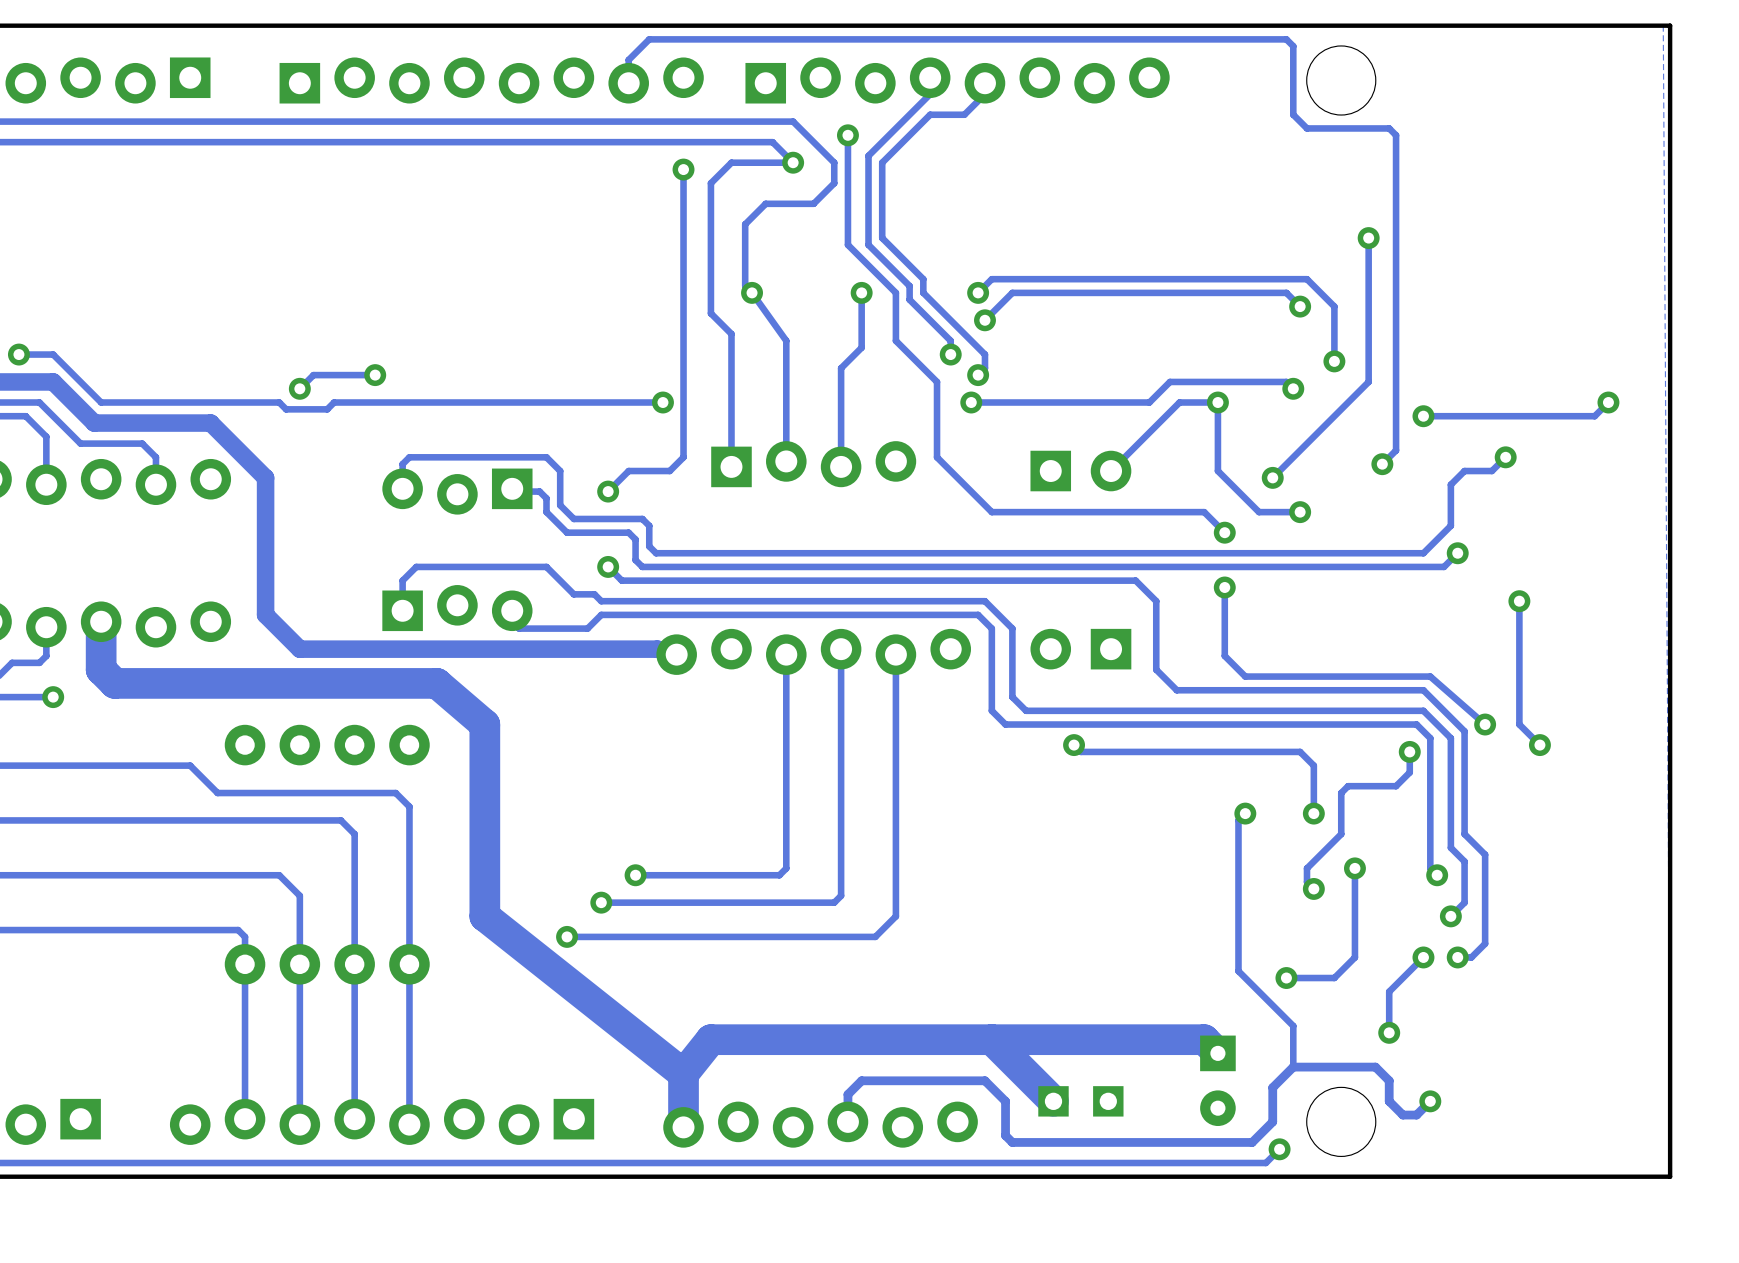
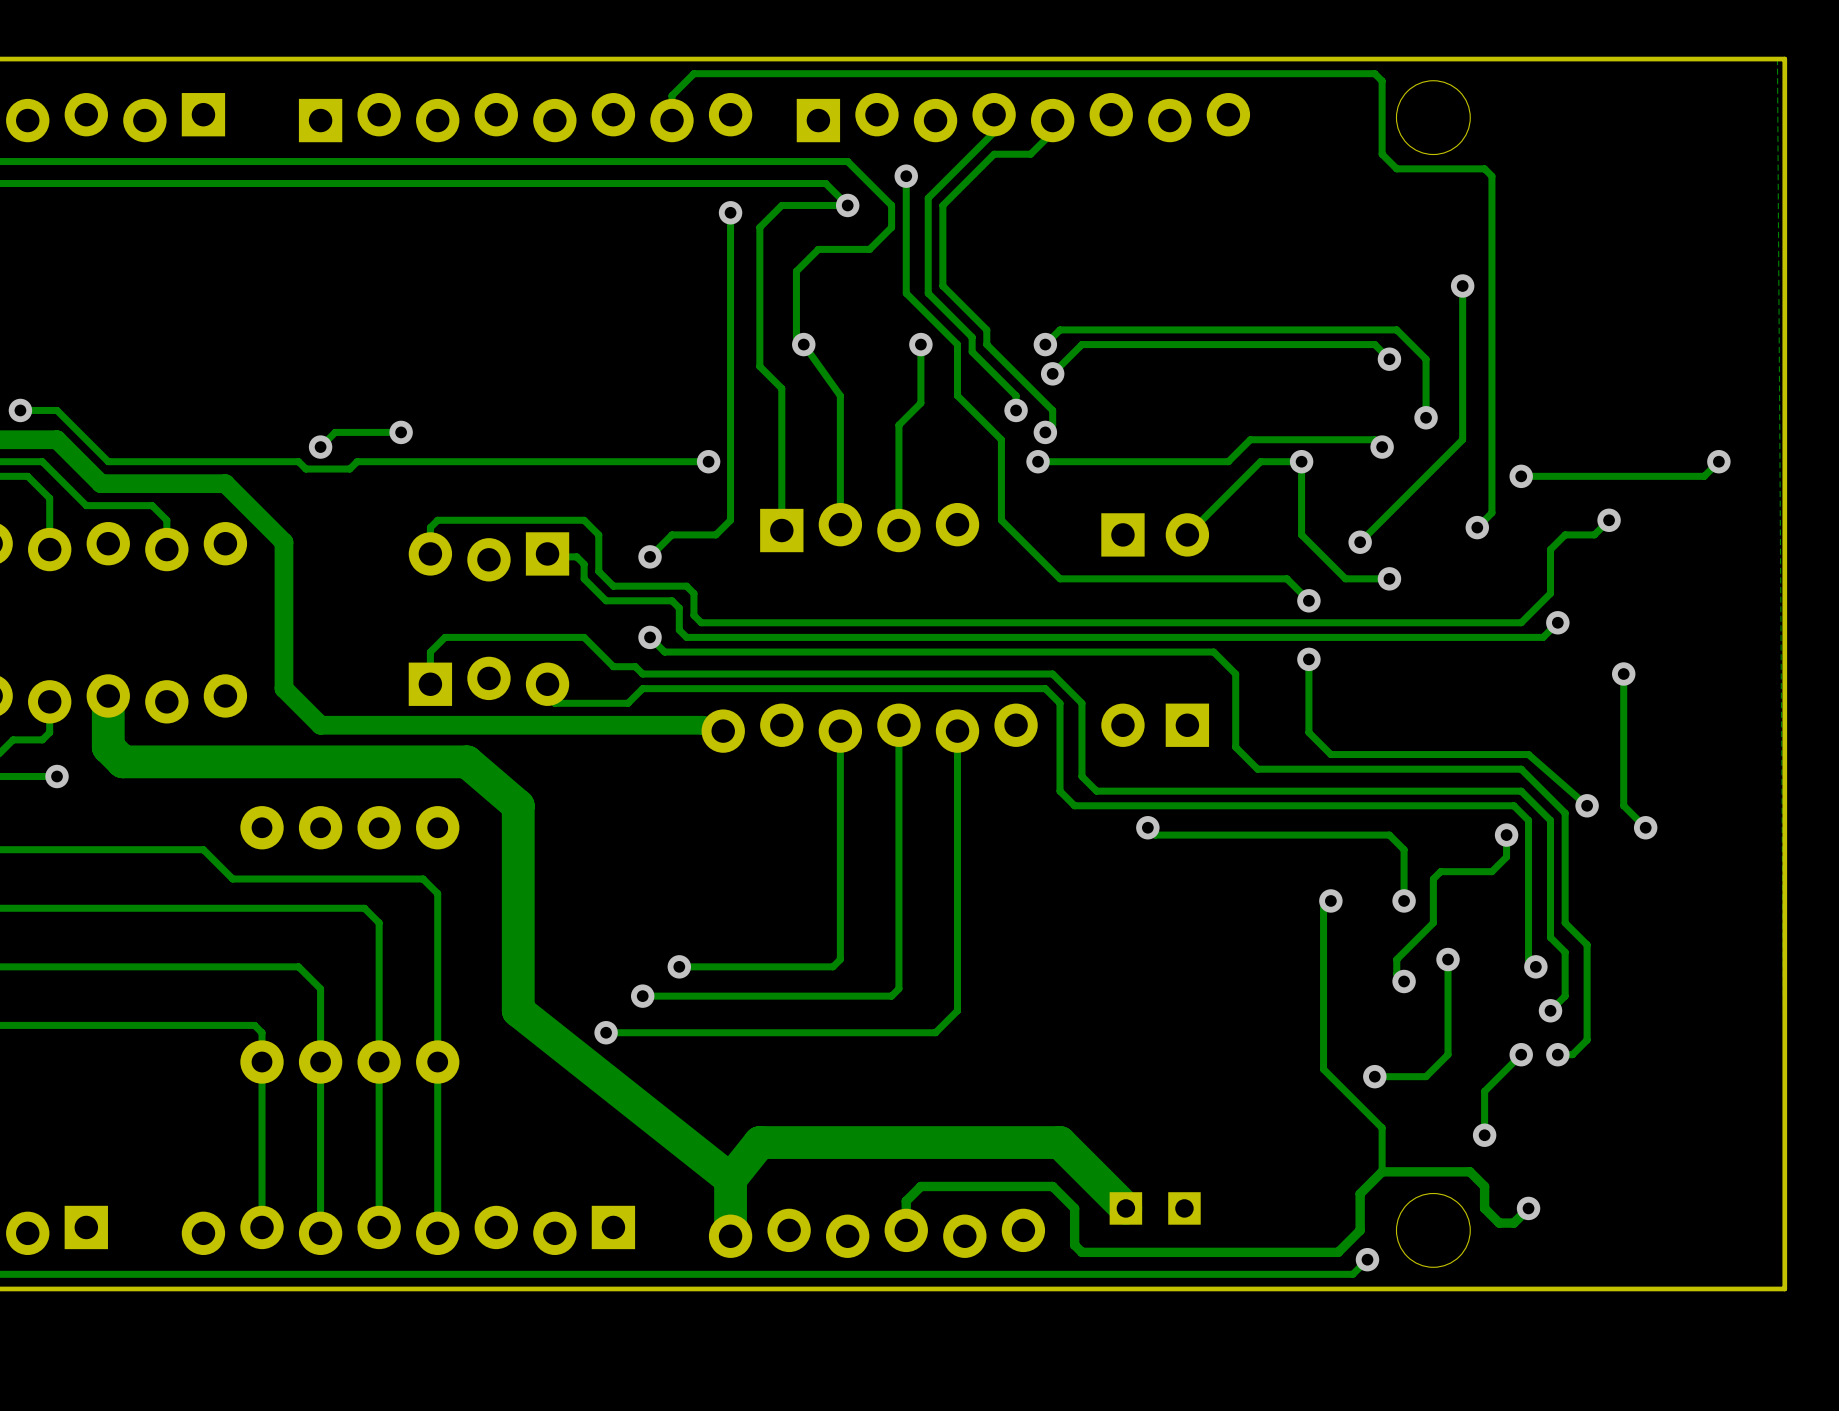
track: (991, 1039) (1204, 1039) (1217, 1053) -> none
part: (1217, 1080) -> none

